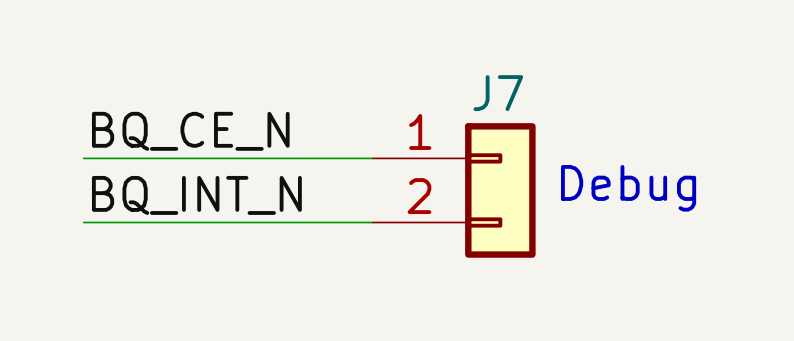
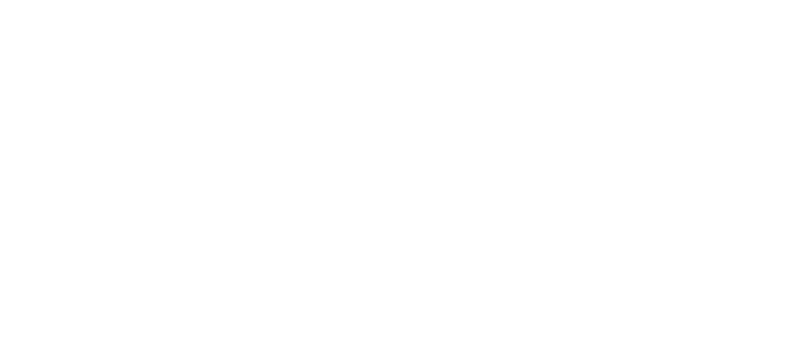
label: BQ_CE_N (190, 131) -> none
wire: (83, 158) (372, 158) -> none
text: Debug (628, 188) -> none
J7: (453, 190) -> none
label: BQ_INT_N (196, 195) -> none
wire: (83, 222) (372, 222) -> none

